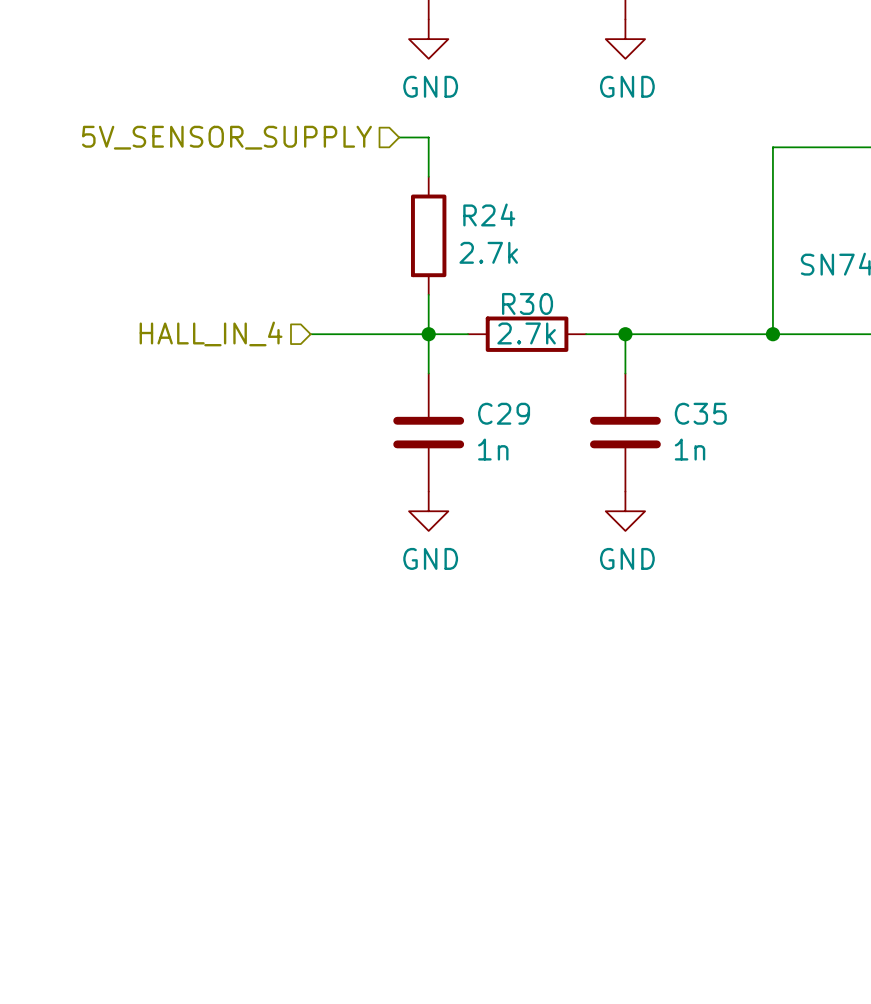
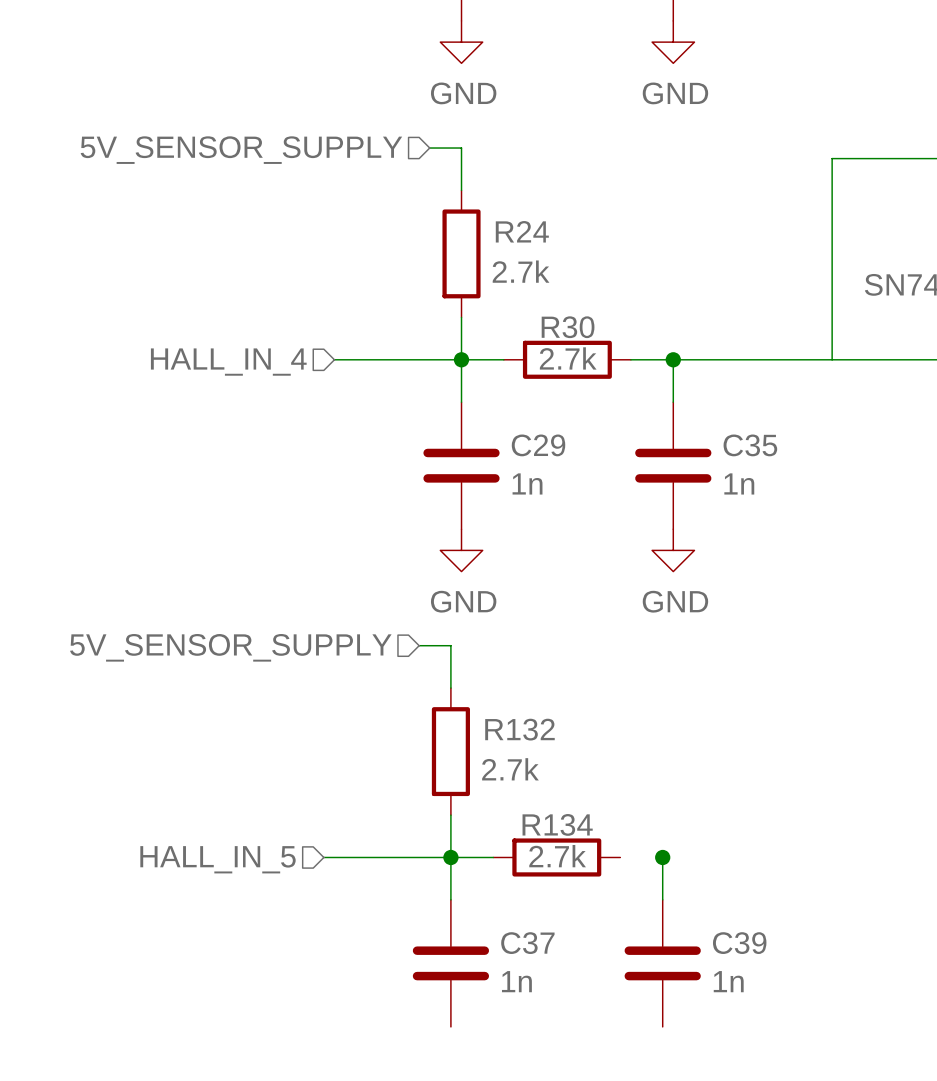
junction: (772, 334) -> none
hierarchical label: none -> 5V_SENSOR_SUPPLY (230, 647)
wire: none -> (419, 645) (450, 645) (450, 688)
R132: none -> 2.7k (450, 751)
wire: none -> (450, 815) (450, 899)
hierarchical label: none -> HALL_IN_5 (217, 859)
wire: none -> (323, 857) (493, 857)
junction: none -> (450, 857)
R134: none -> 2.7k (556, 857)
wire: none -> (662, 857) (662, 899)
junction: none -> (662, 857)
C37: none -> 1n (450, 963)
C39: none -> 1n (662, 963)

